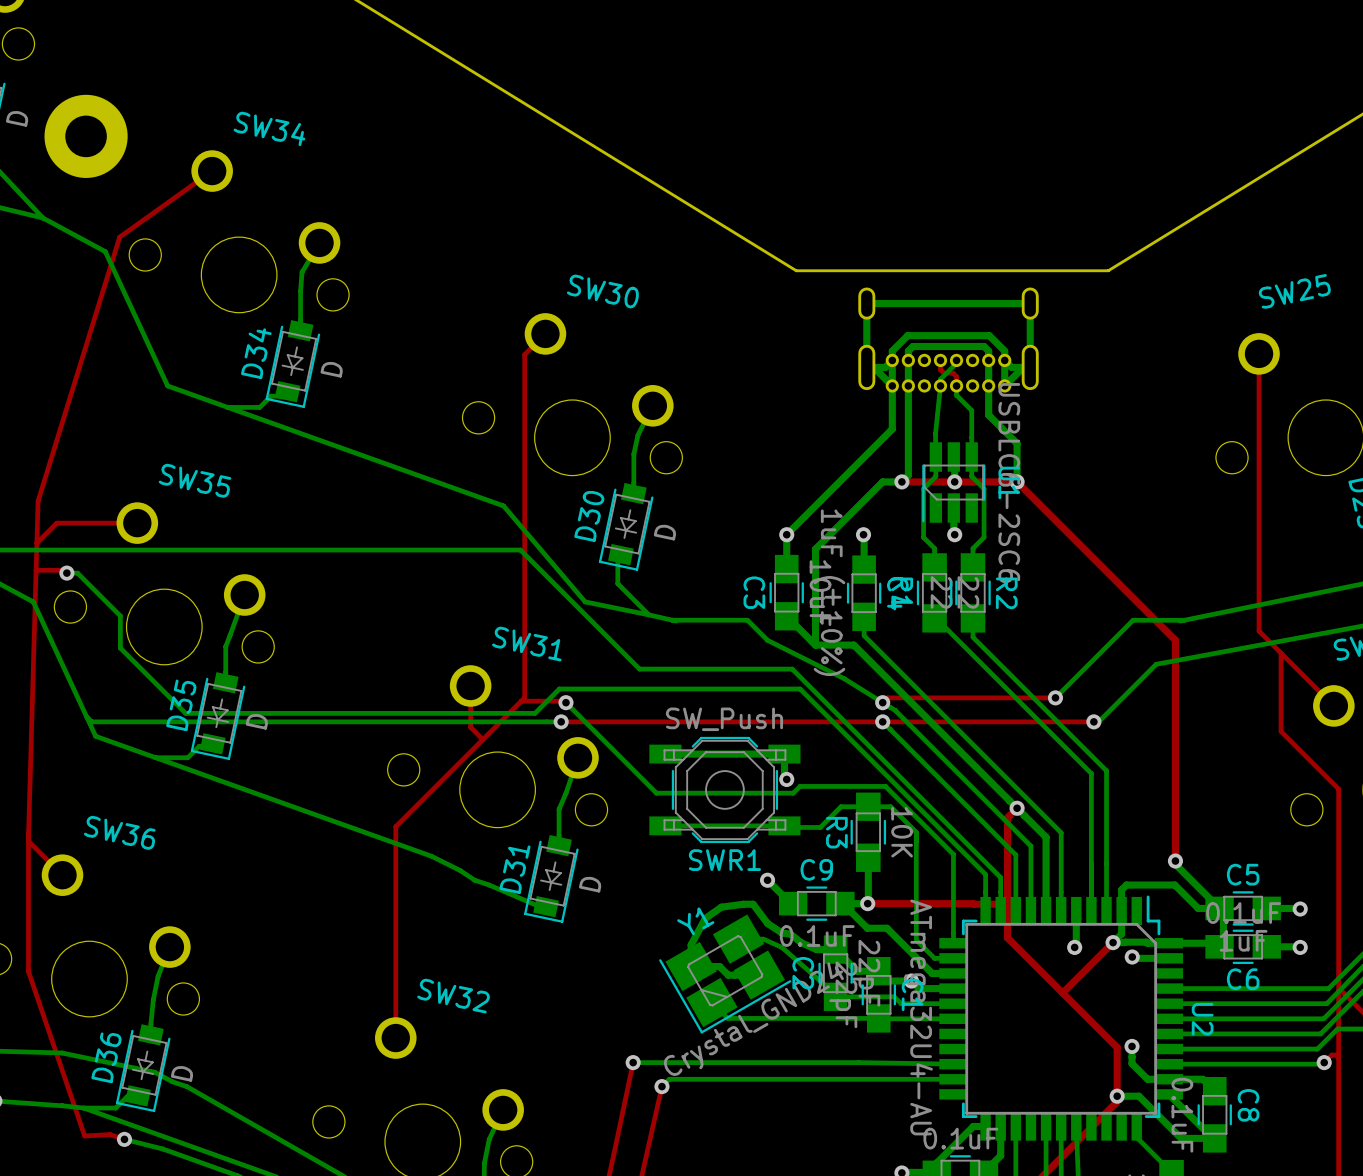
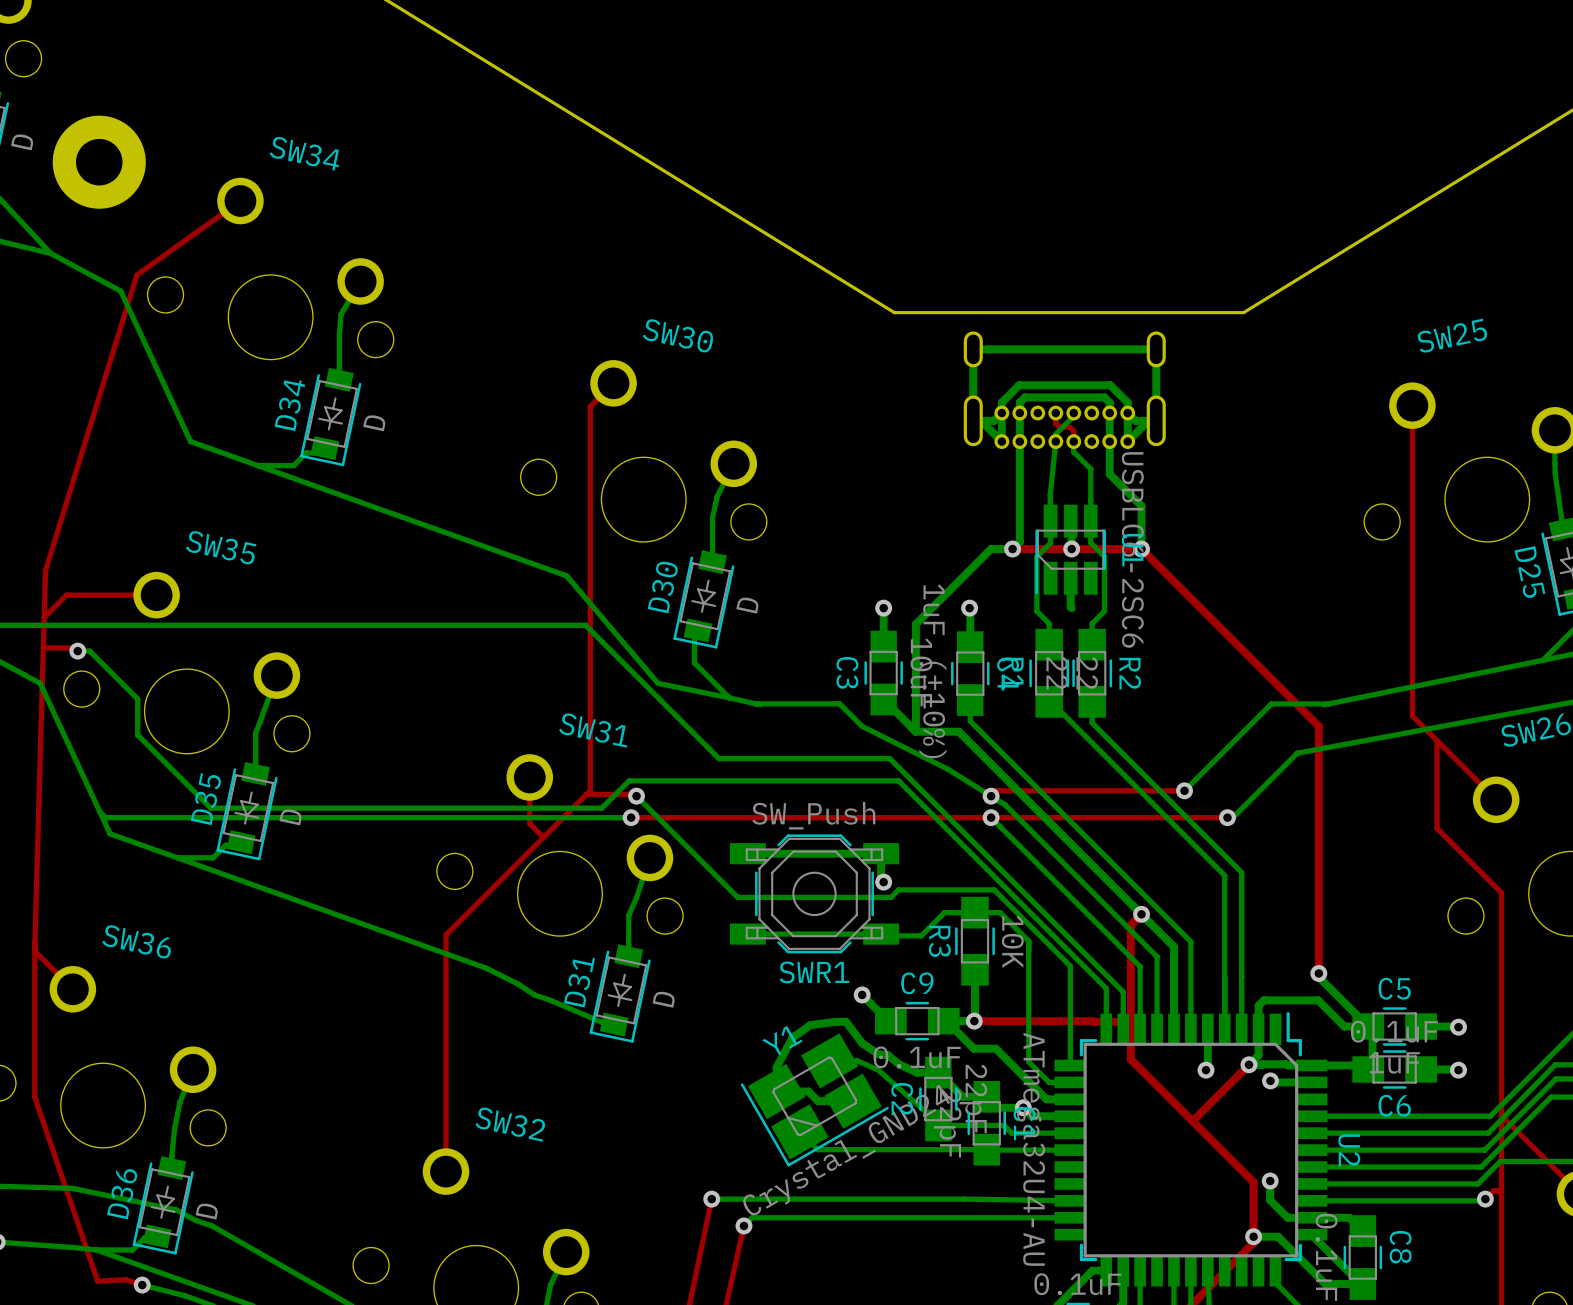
bottom track: (892, 385) (892, 429) (786, 534) -> none
via: (954, 534) -> none

